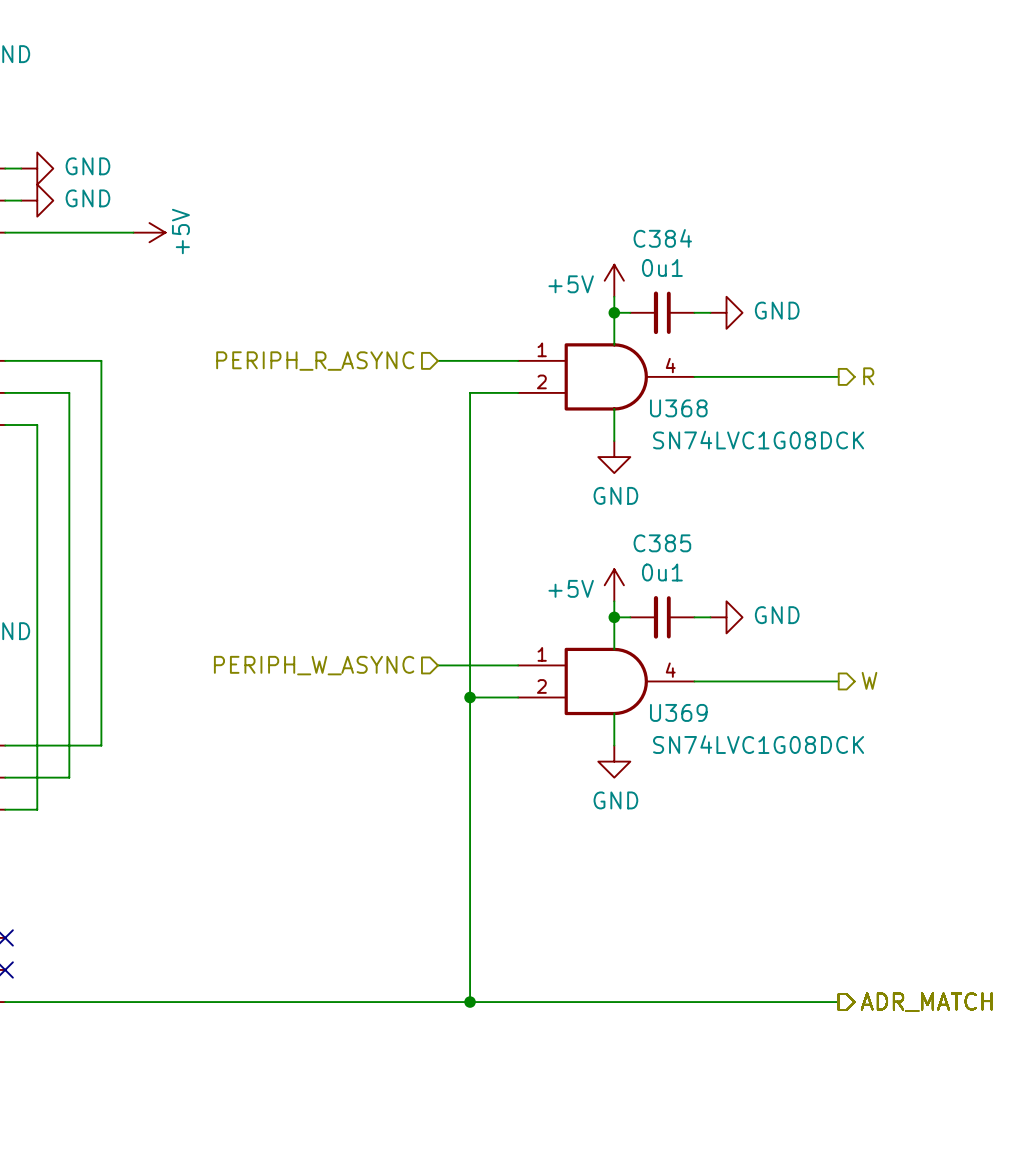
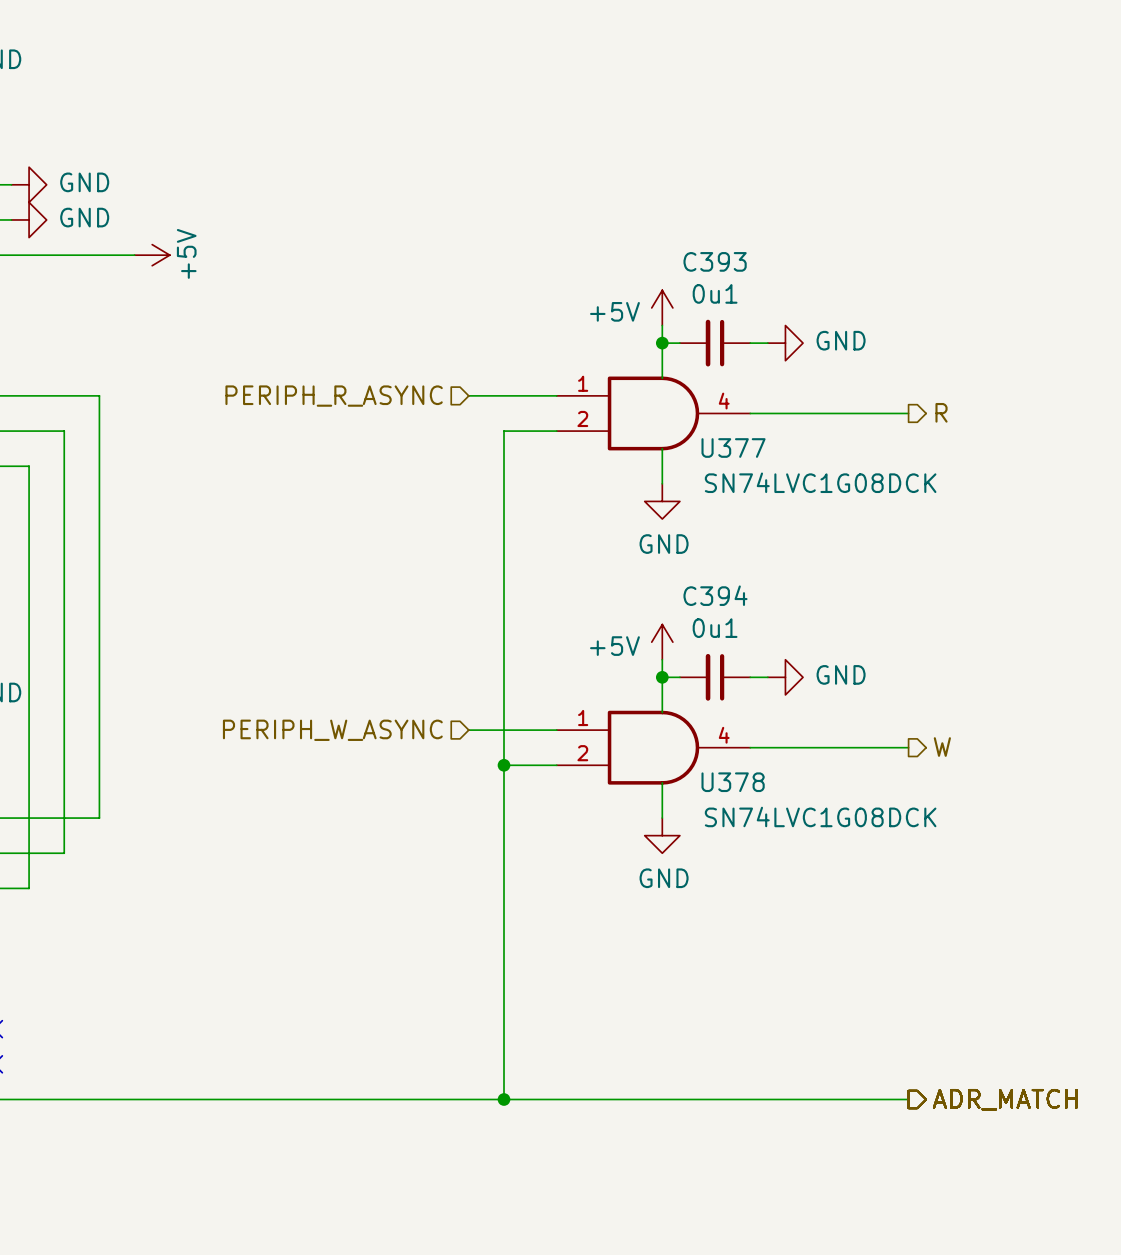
C384 name: C384 (662, 238) -> C393 (715, 261)
U368 name: U368 (678, 408) -> U377 (733, 448)
C385 name: C385 (662, 543) -> C394 (715, 595)
U369 name: U369 (678, 712) -> U378 (733, 782)

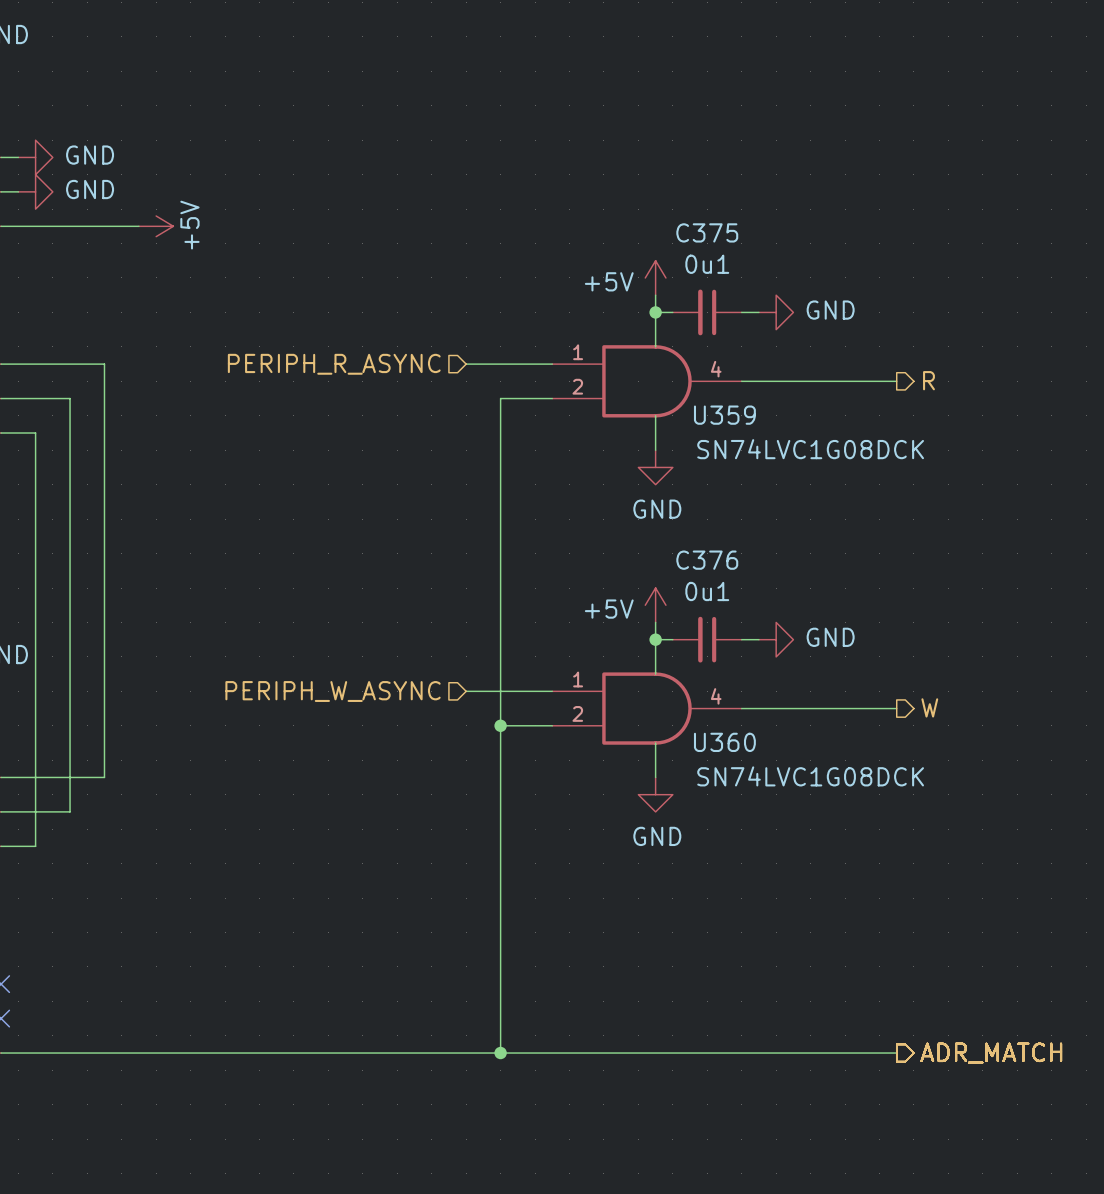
C393 name: C393 (715, 261) -> C375 (707, 232)
U377 name: U377 (733, 448) -> U359 (724, 415)
C394 name: C394 (715, 595) -> C376 (707, 560)
U378 name: U378 (733, 782) -> U360 (724, 742)

